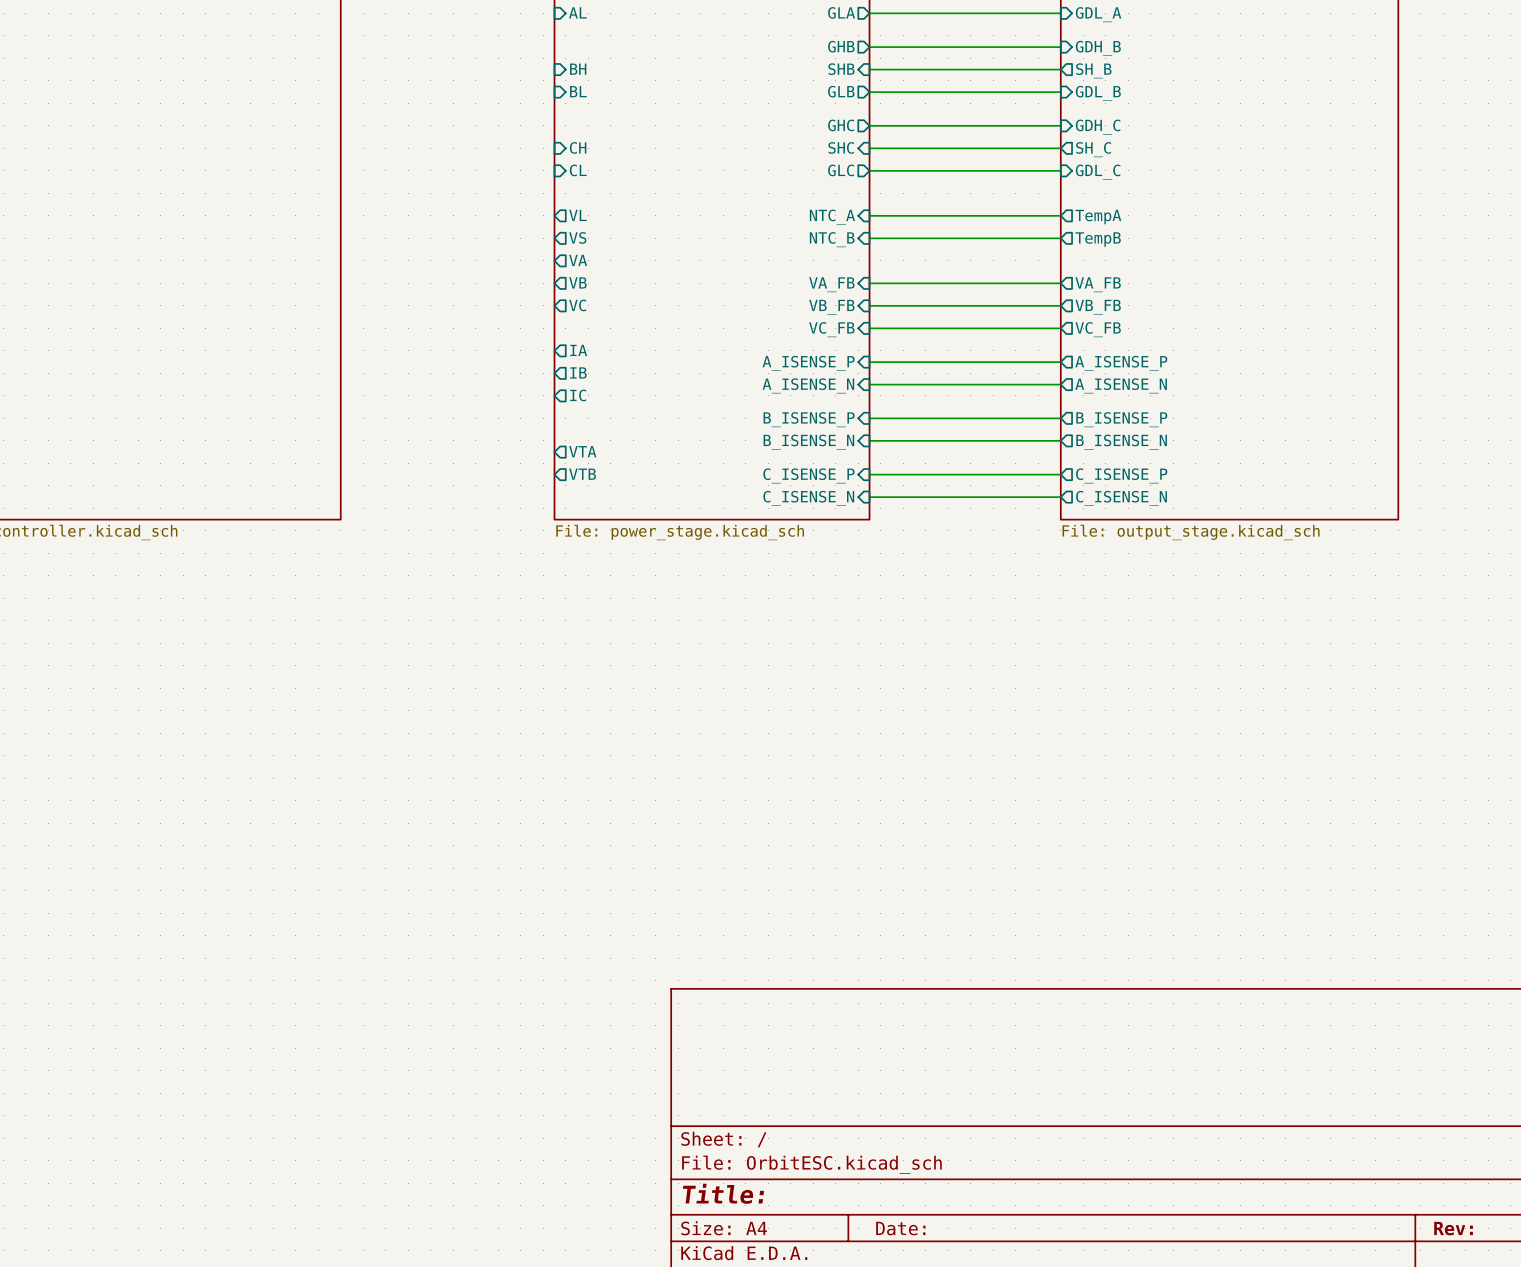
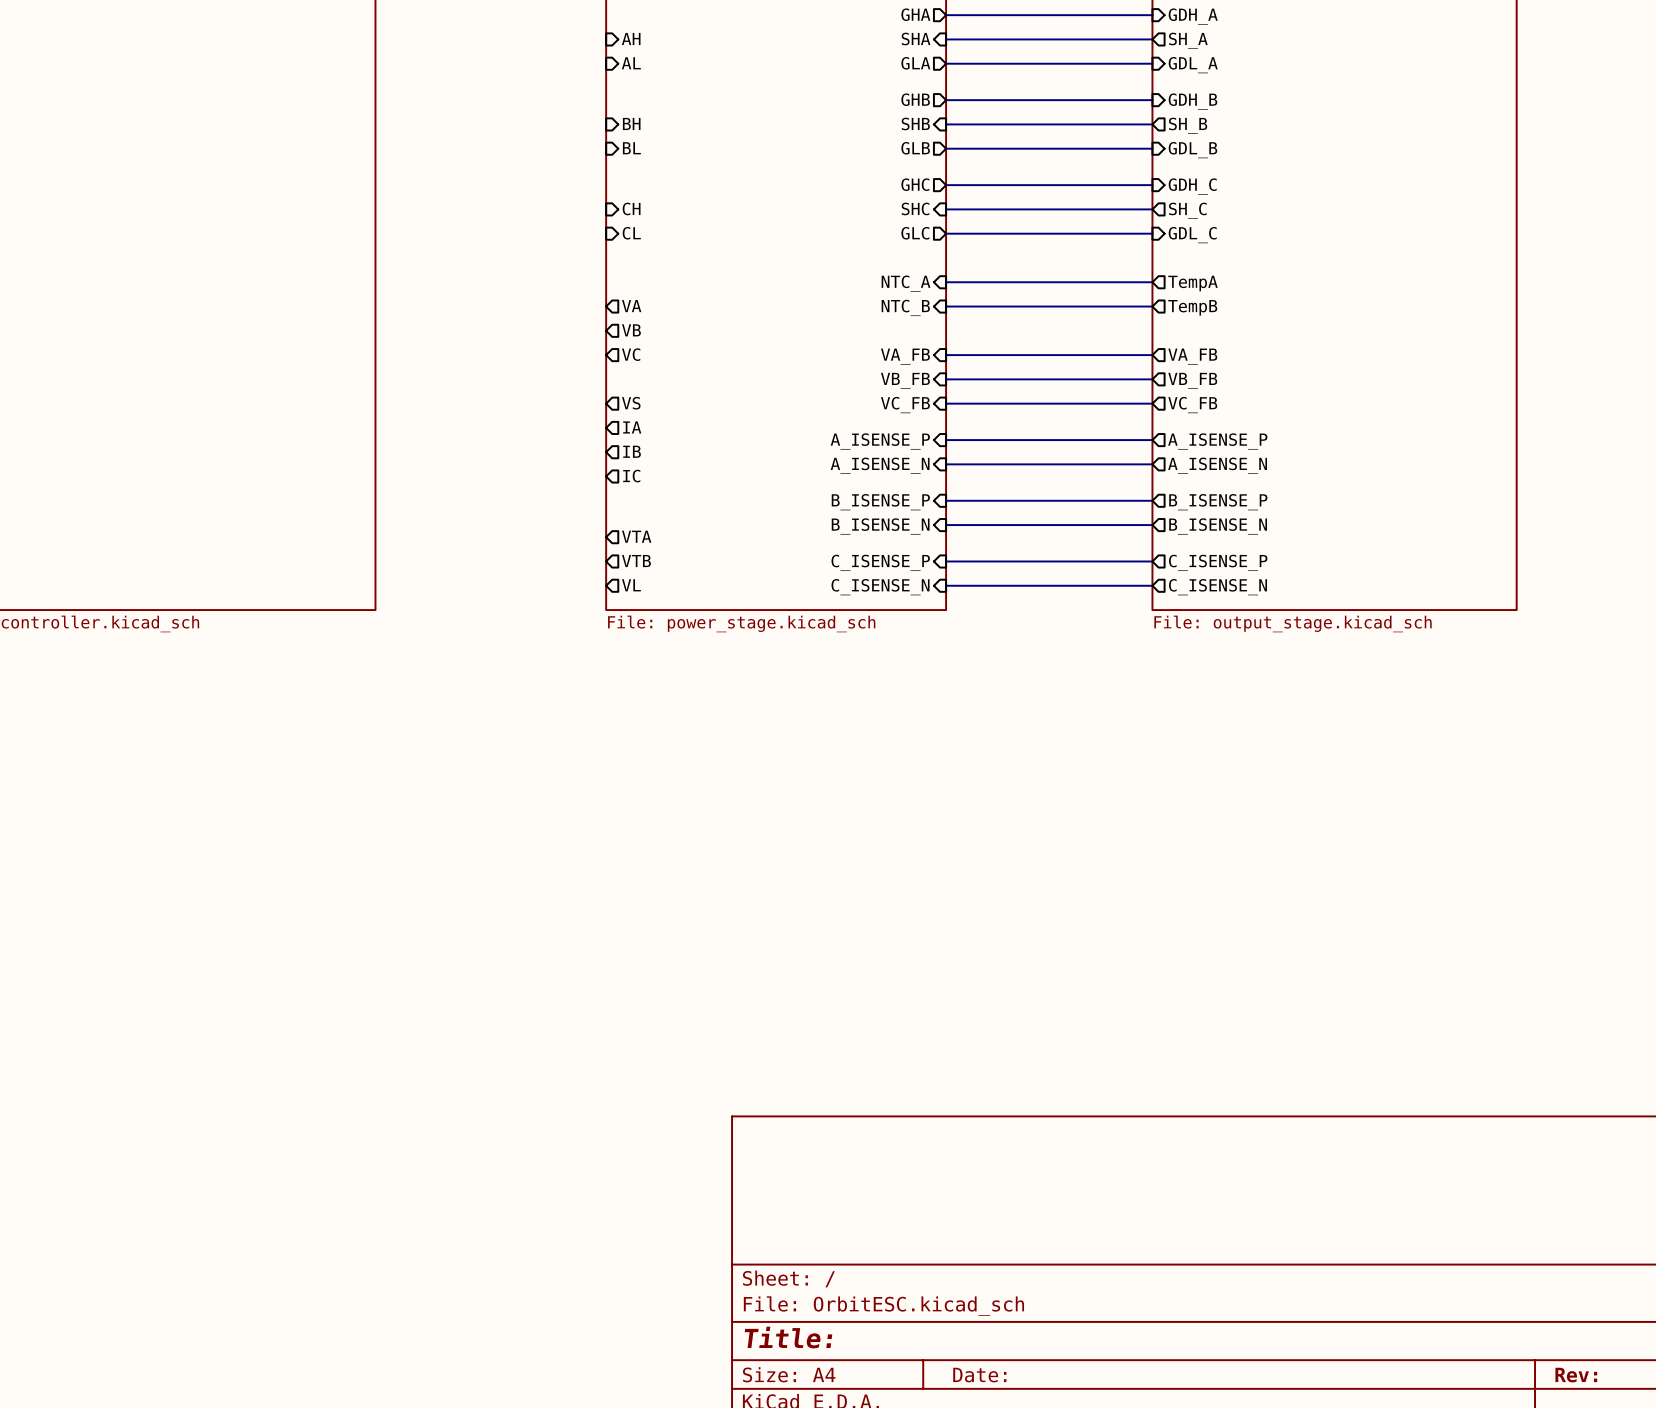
sheet pin: VL (577, 215) -> none
sheet pin: VS (577, 237) -> VA (631, 306)
sheet pin: VA (578, 260) -> VB (631, 330)
sheet pin: VB (577, 282) -> VC (631, 354)
sheet pin: VC (577, 305) -> none
sheet pin: none -> VS (631, 403)
sheet pin: none -> VL (631, 585)

